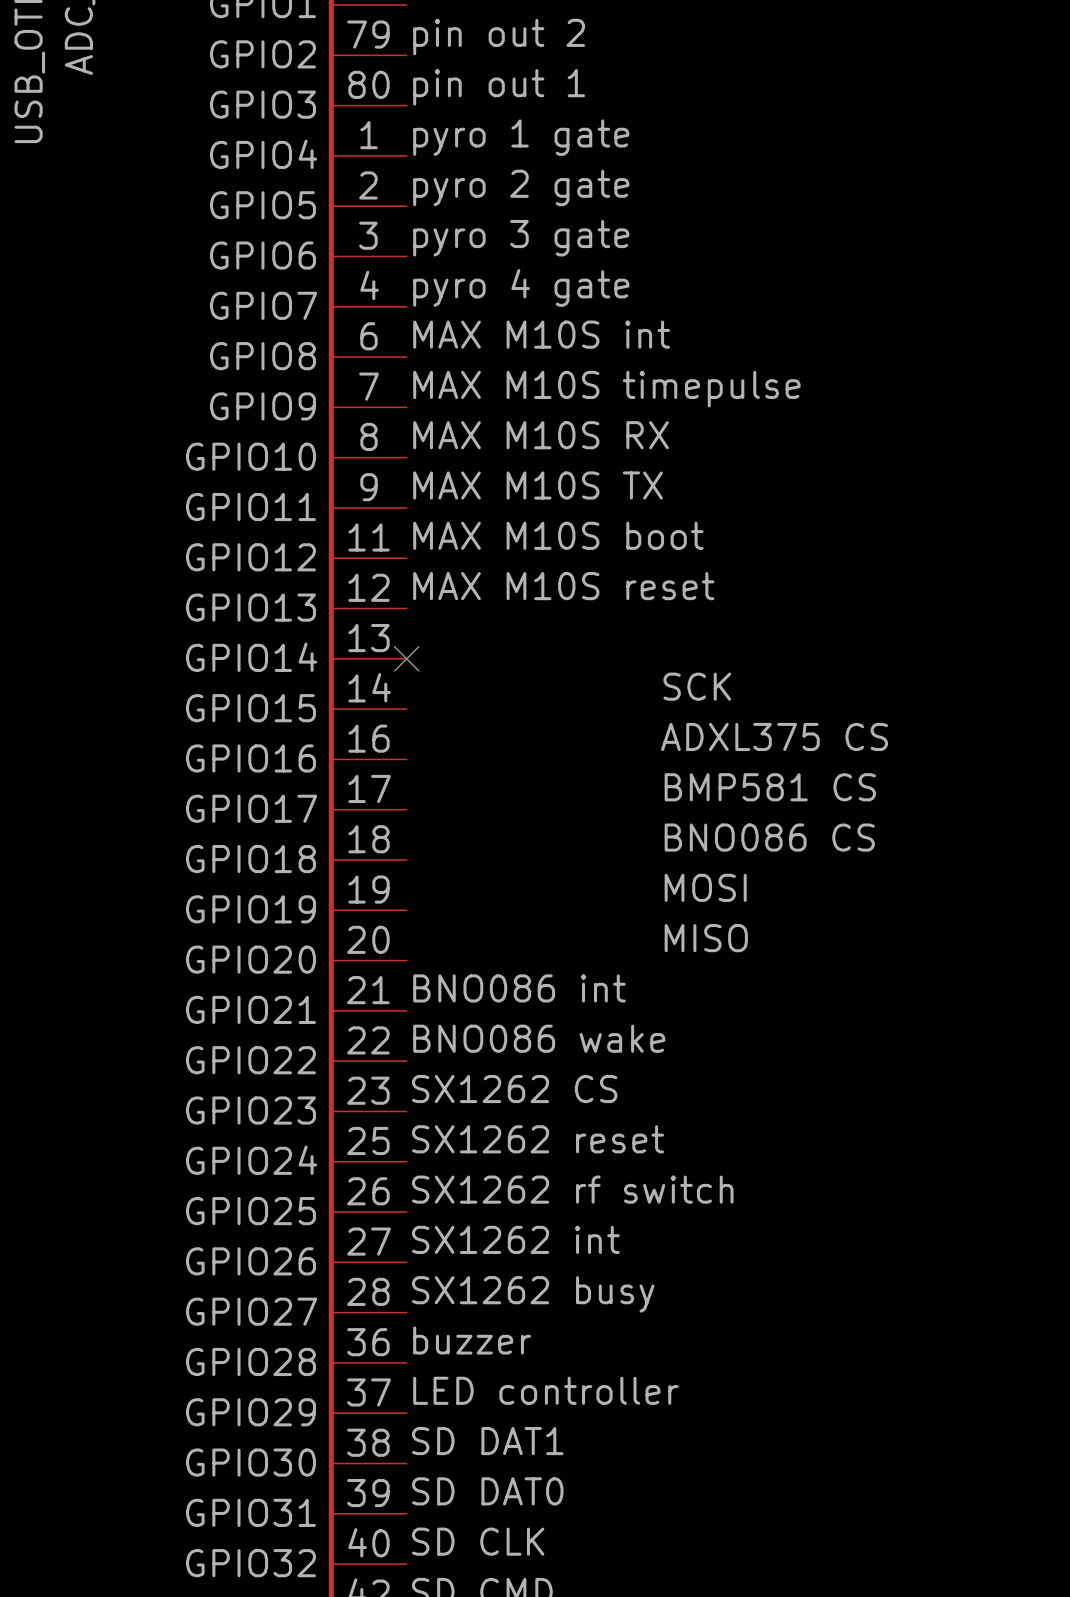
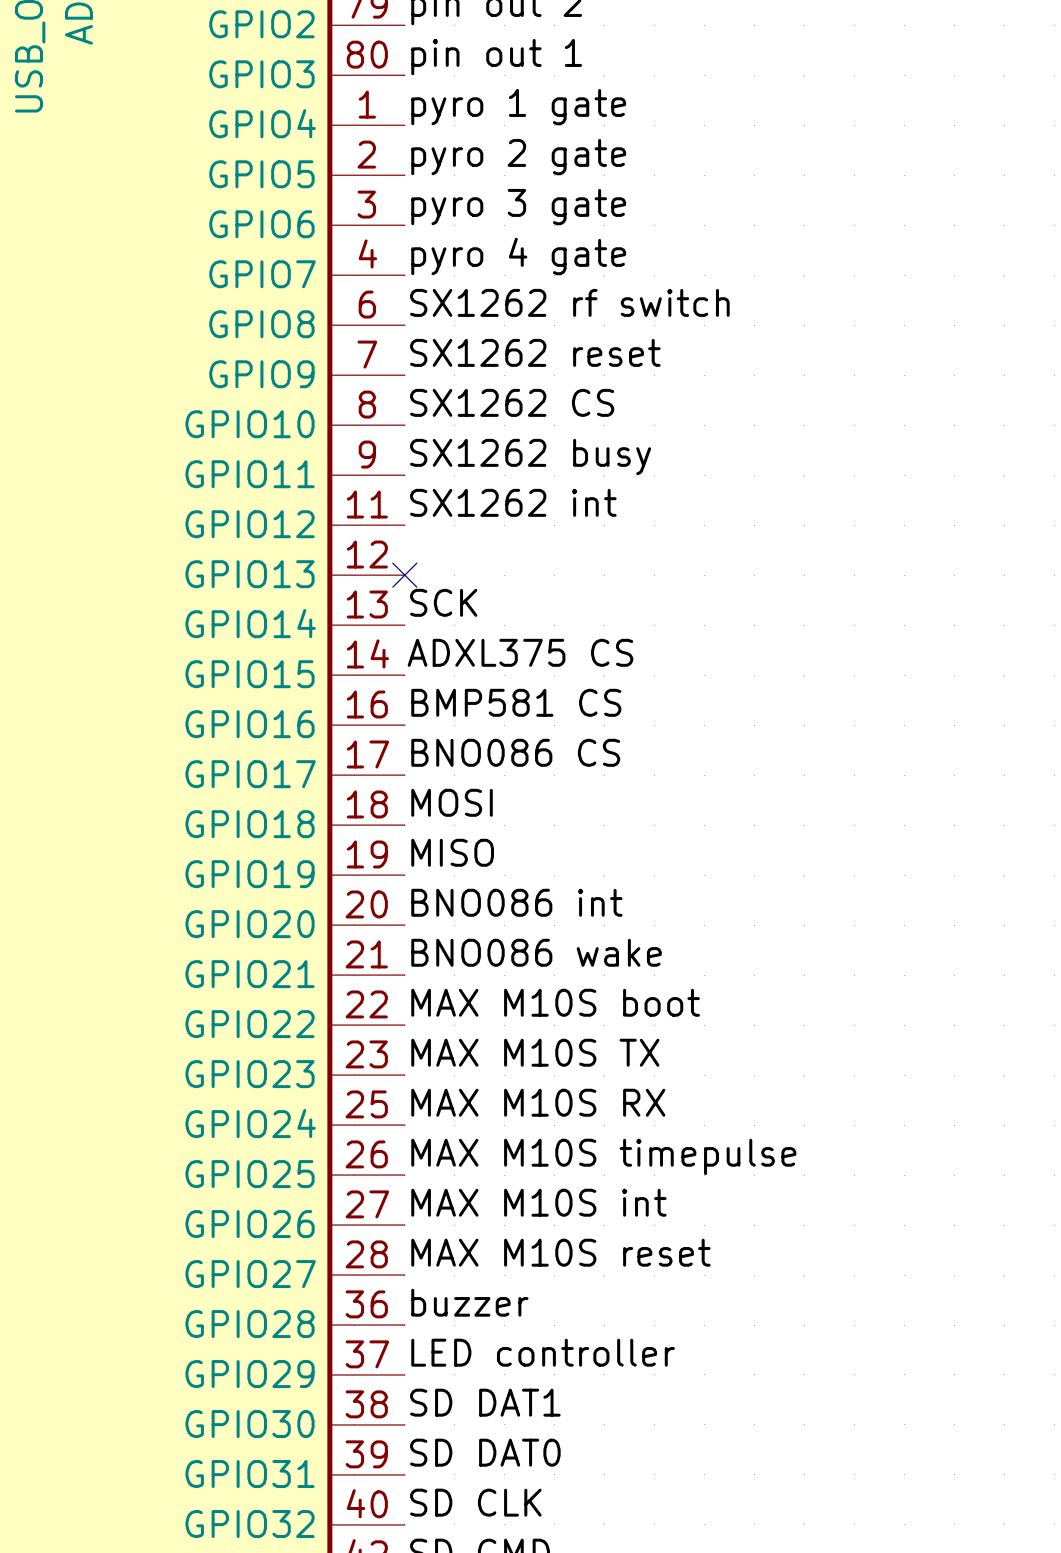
label: MAX M10S int (541, 334) -> SX1262 rf switch (569, 302)
label: MAX M10S timepulse (606, 389) -> SX1262 reset (535, 352)
label: MAX M10S RX (541, 435) -> SX1262 CS (512, 402)
label: MAX M10S TX (538, 485) -> SX1262 busy (530, 457)
label: MAX M10S boot (558, 535) -> SX1262 int (513, 502)
label: MAX M10S reset (563, 586) -> none
no-connect mark position: (406, 658) -> (404, 575)
label position: SCK (697, 686) -> SCK (443, 602)
label position: ADXL375 CS (774, 736) -> ADXL375 CS (520, 652)
label position: BMP581 CS (770, 787) -> BMP581 CS (516, 702)
label position: BNO086 CS (769, 837) -> BNO086 CS (515, 752)
label position: MOSI (705, 887) -> MOSI (452, 802)
label: none -> BNO086 int (516, 902)
label position: MISO (706, 938) -> MISO (452, 852)
label: BNO086 int (519, 988) -> BNO086 wake (536, 952)
label: BNO086 wake (539, 1038) -> MAX M10S boot (555, 1002)
label: SX1262 CS (514, 1089) -> MAX M10S TX (535, 1052)
label: SX1262 reset (538, 1139) -> MAX M10S RX (538, 1102)
label: SX1262 rf switch (572, 1189) -> MAX M10S timepulse (603, 1156)
label: SX1262 int (515, 1239) -> MAX M10S int (538, 1202)
label: SX1262 busy (533, 1294) -> MAX M10S reset (560, 1252)

